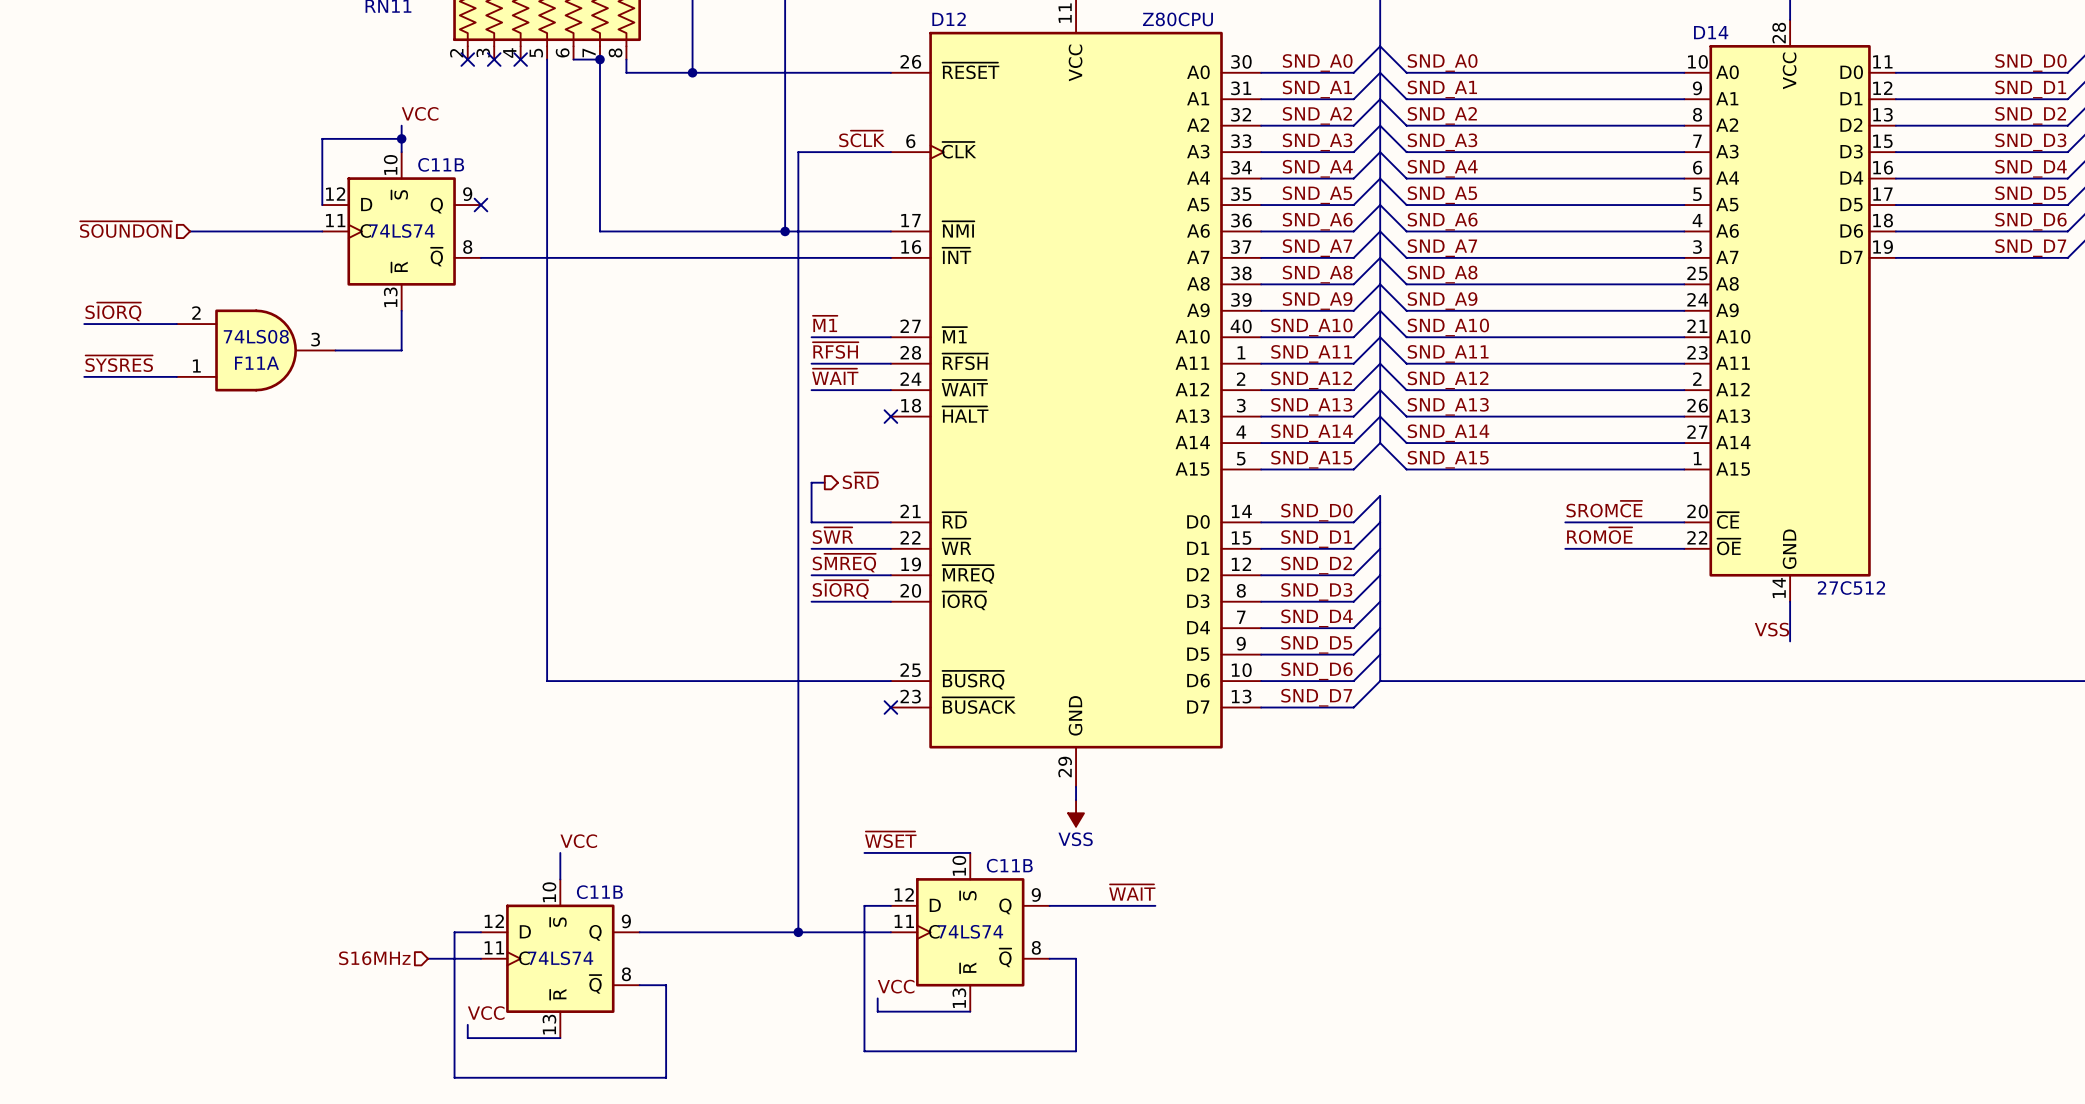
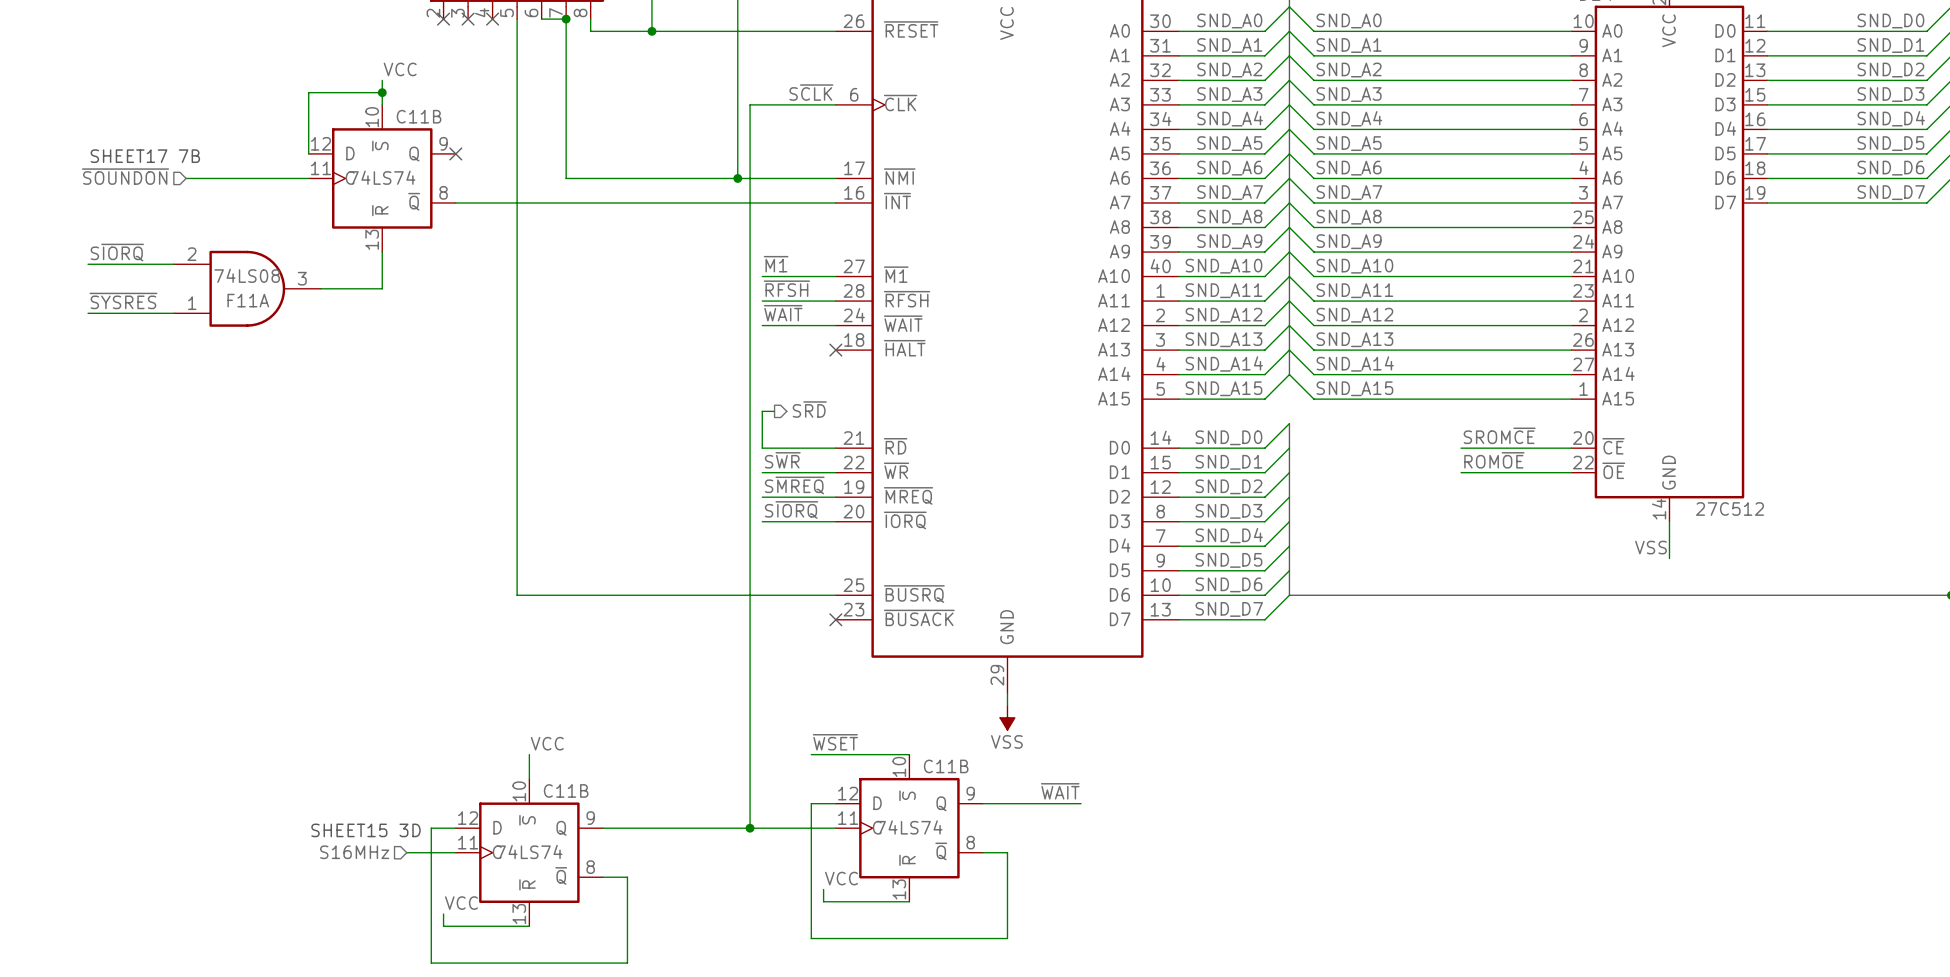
text: none -> SHEET17 7B (145, 156)
text: none -> SHEET15 3D (366, 830)

